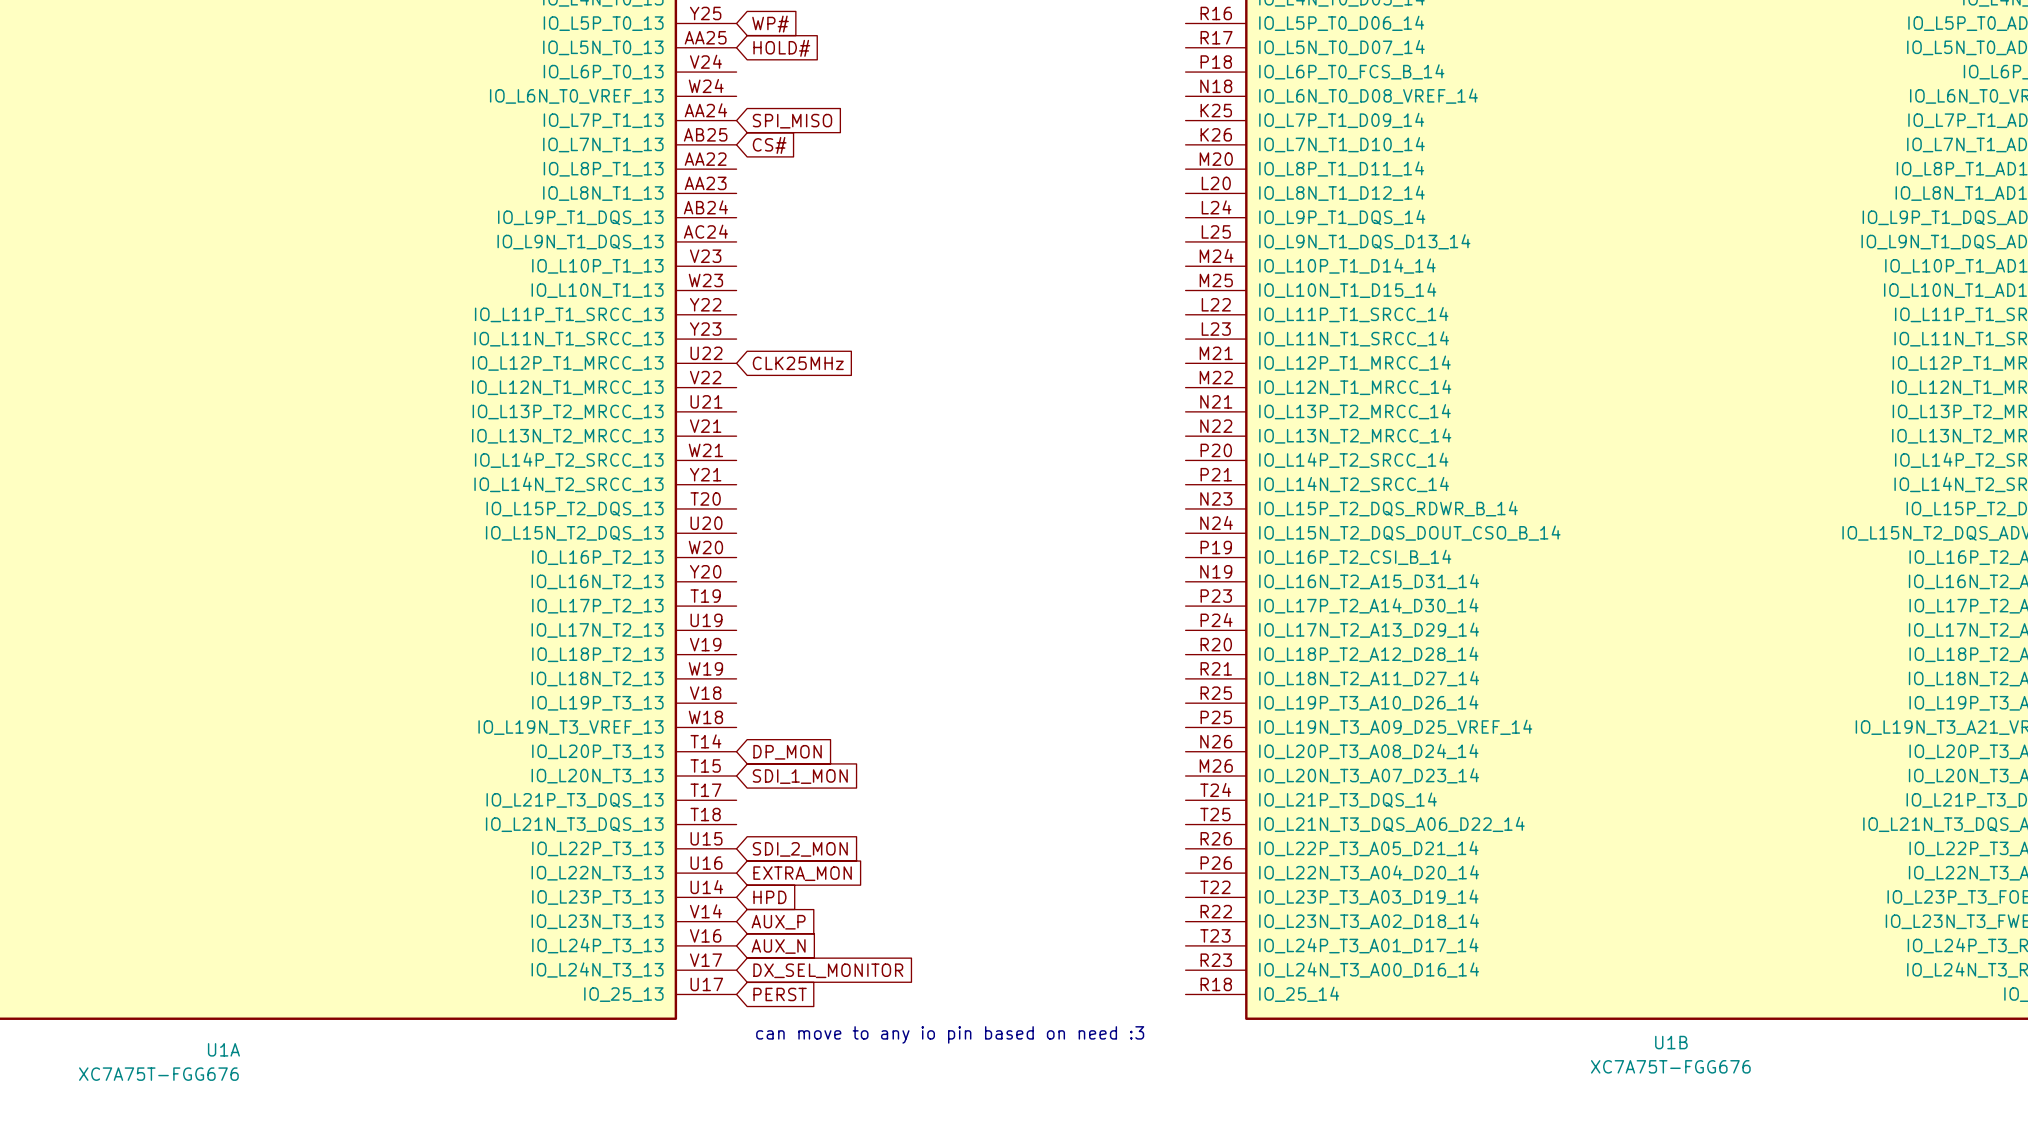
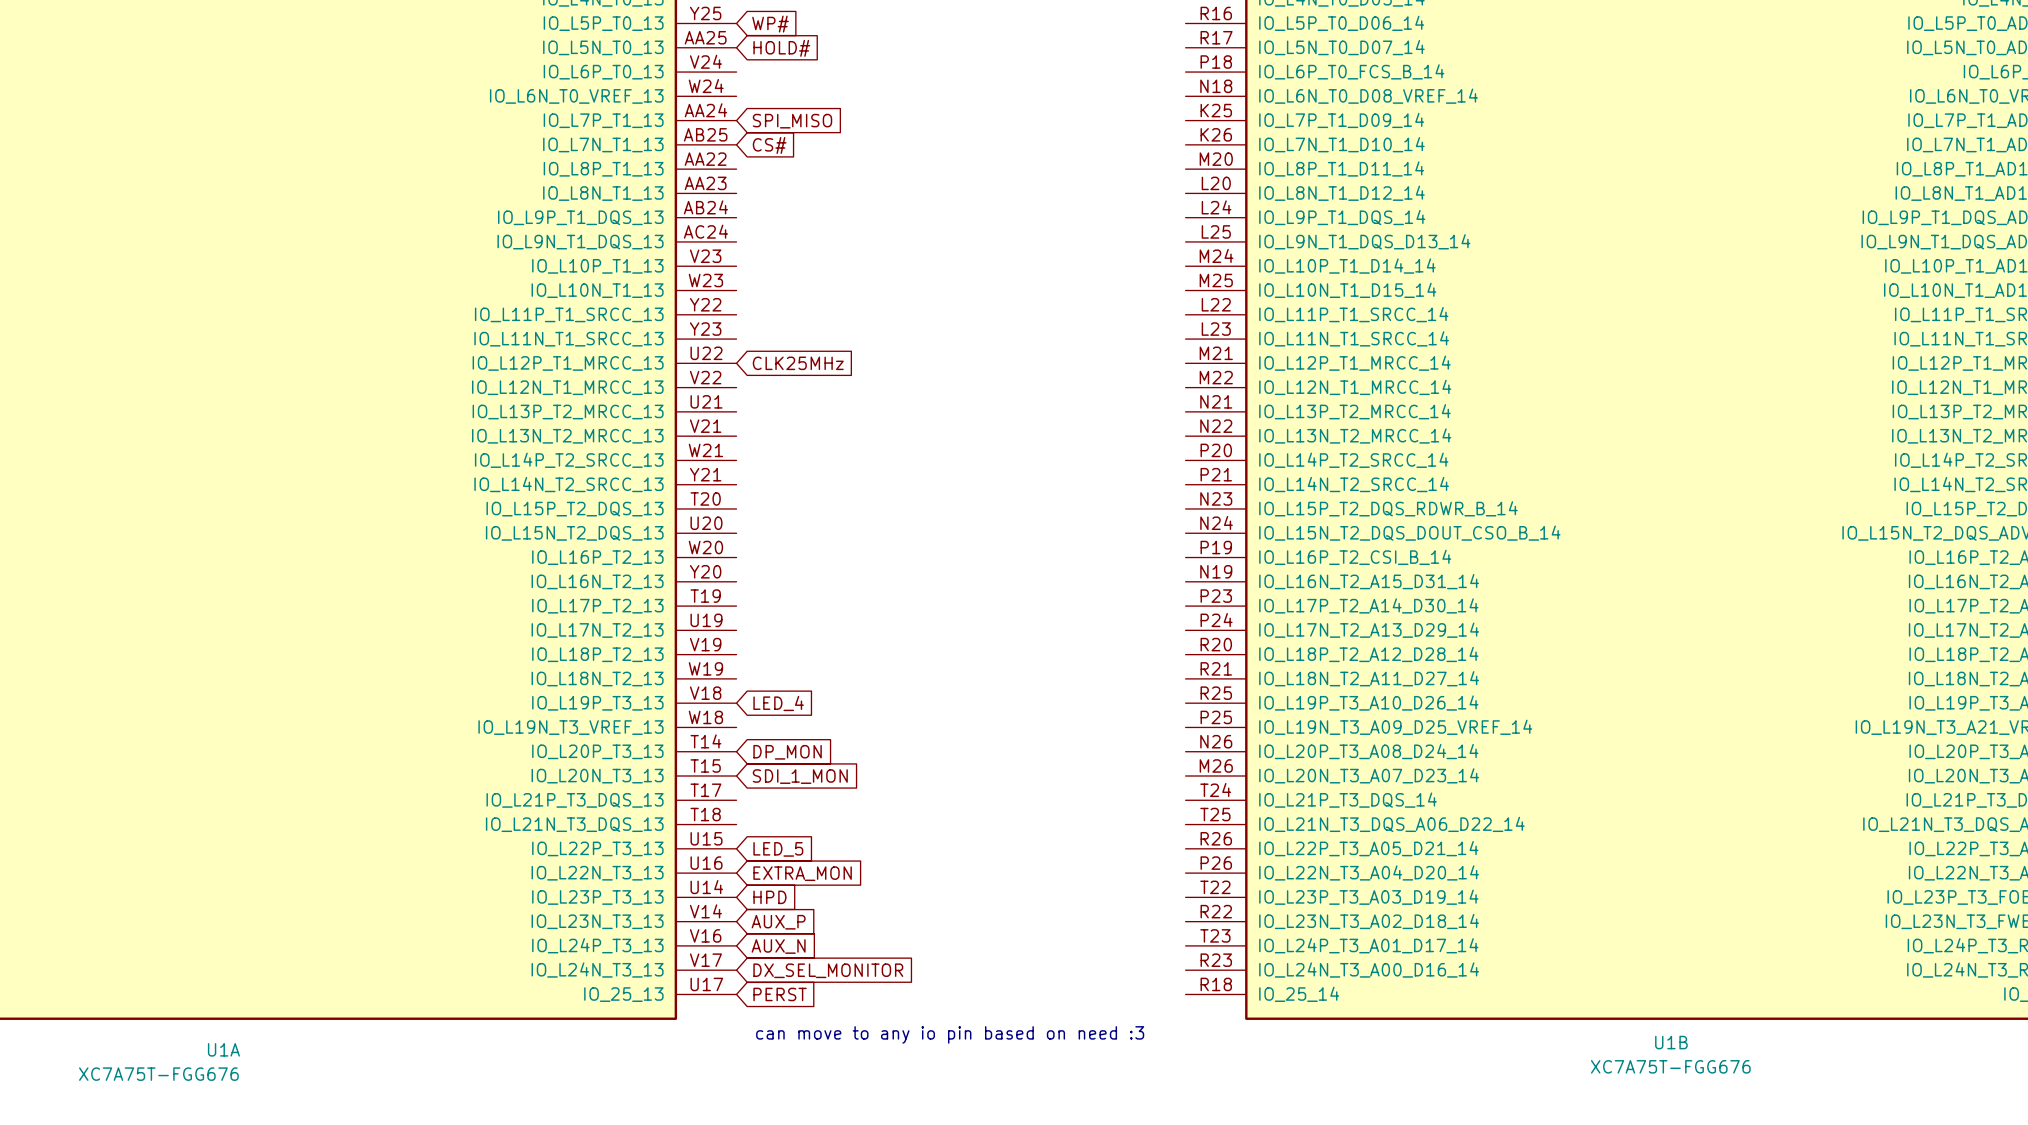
global label: none -> LED_4 (778, 703)
global label: SDI_2_MON (800, 849) -> LED_5 (778, 849)

